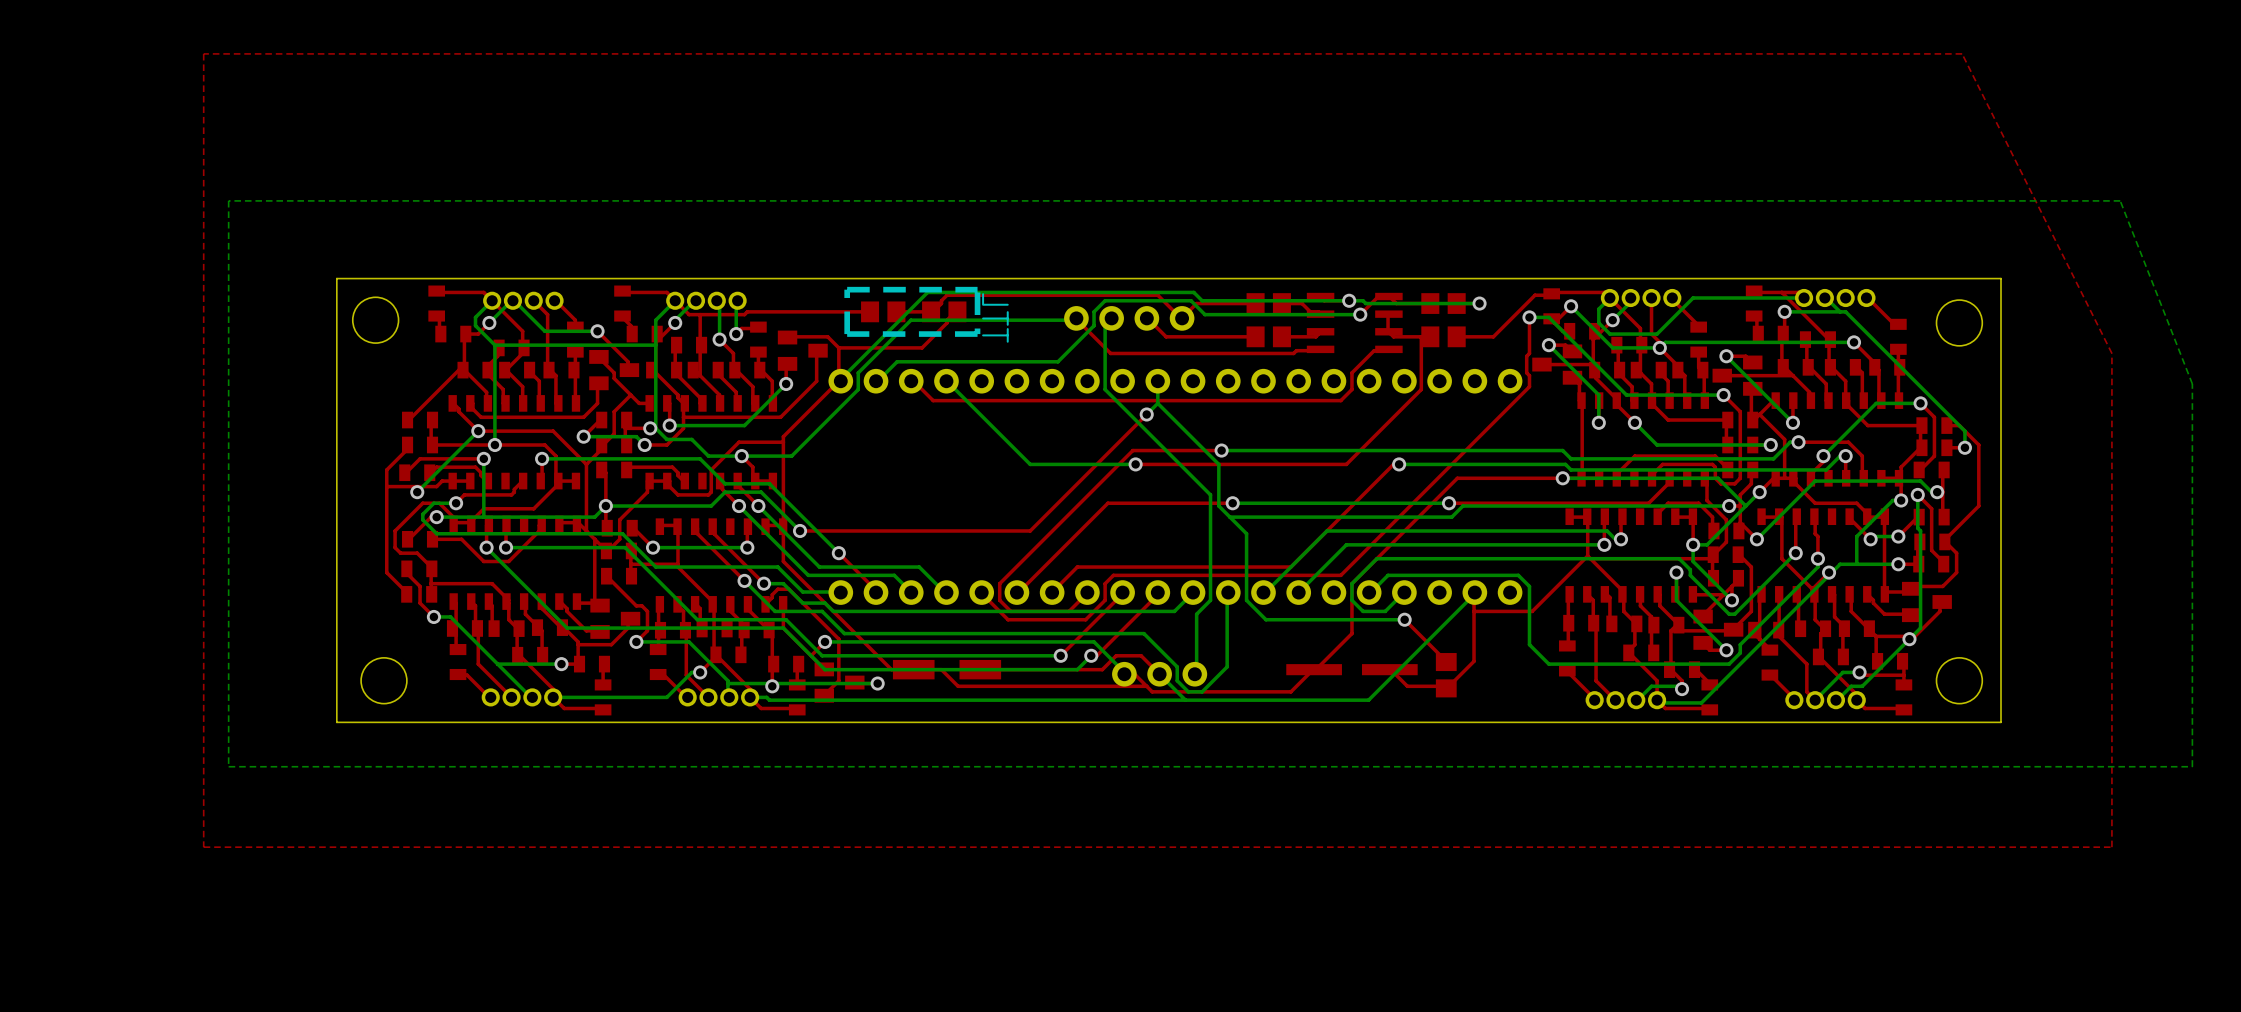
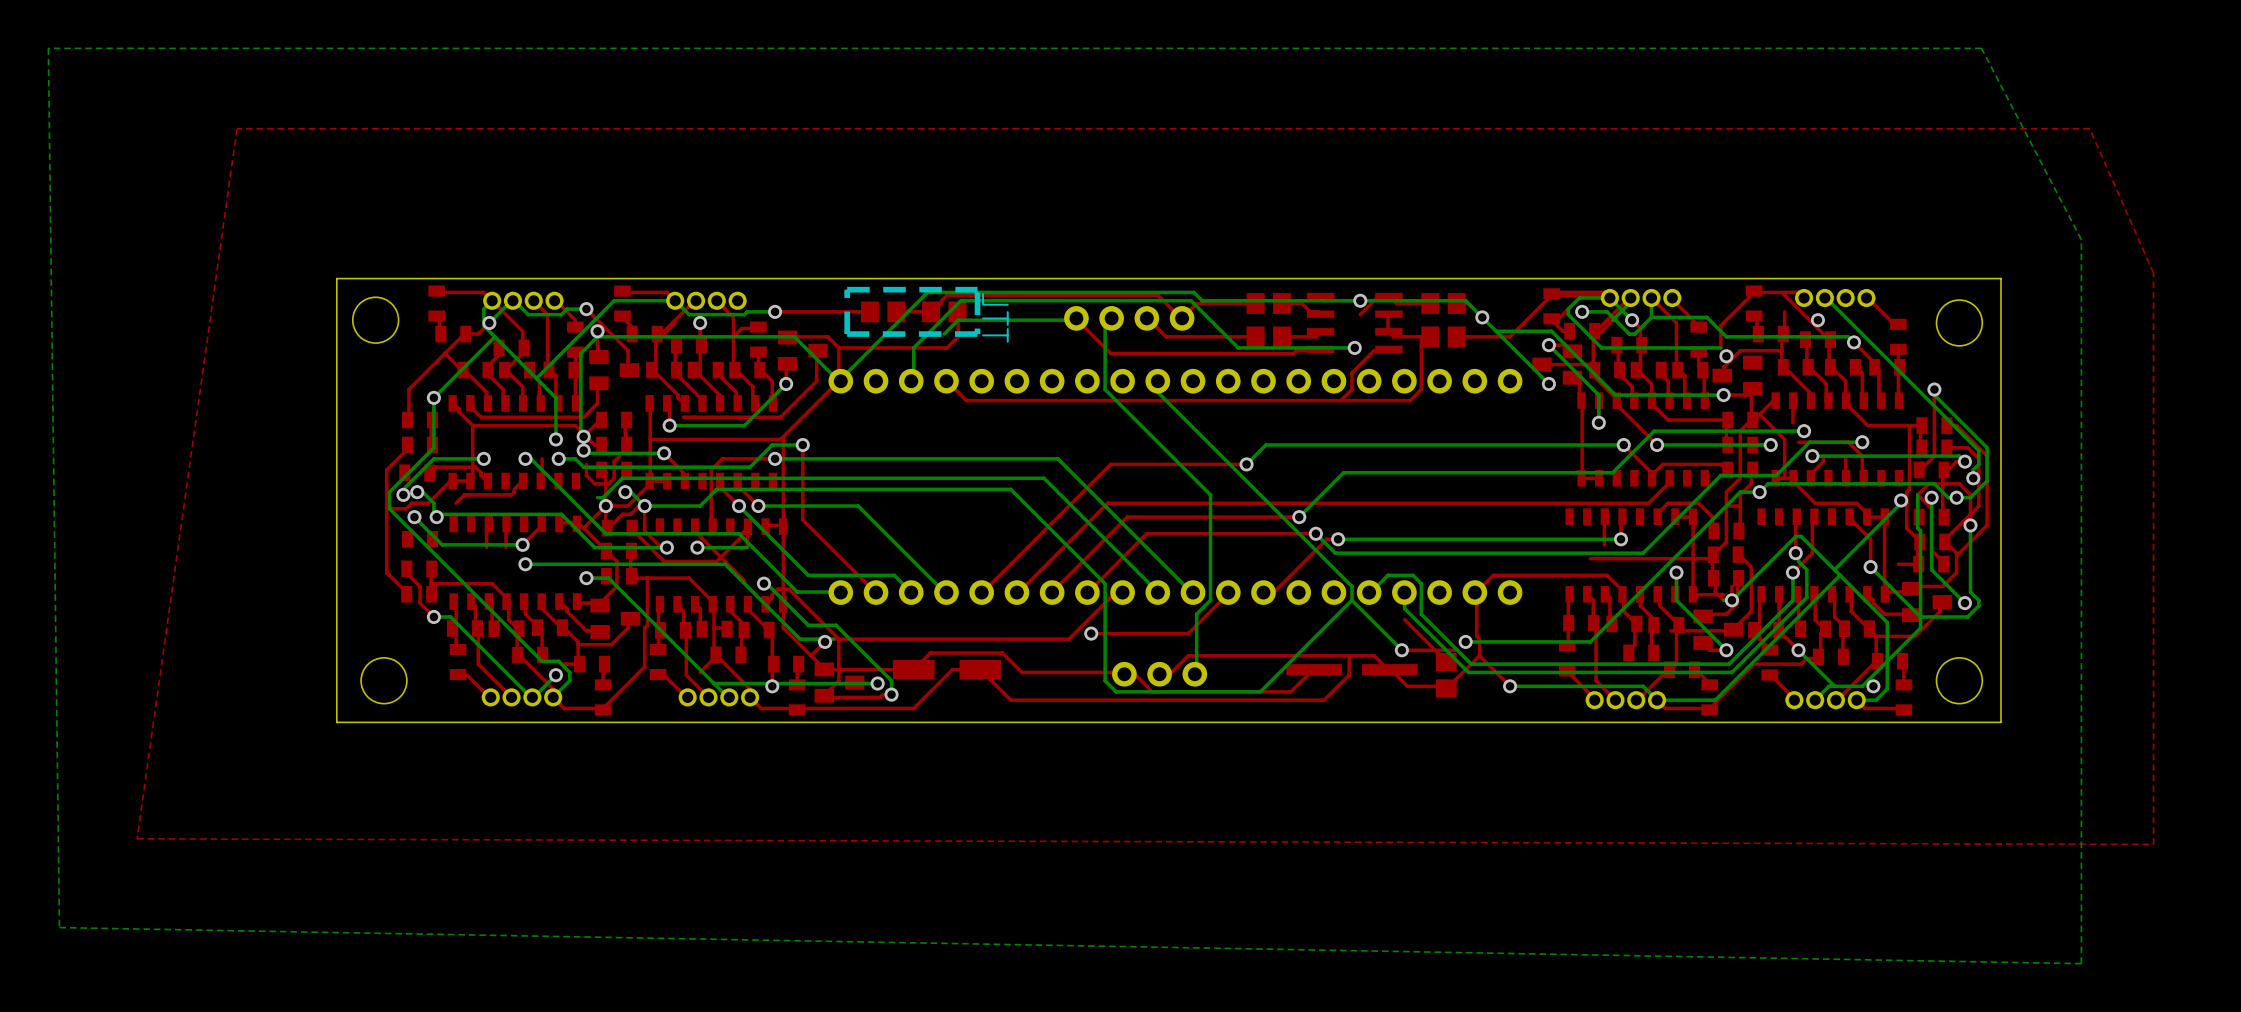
top zone outline: (1962, 53) (203, 53) (203, 847) (2111, 847) (2111, 353) (1962, 53) -> (2089, 128) (2153, 273) (2153, 844) (137, 838) (236, 128) (2089, 128)
bottom zone outline: (2120, 200) (228, 200) (228, 766) (2192, 766) (2192, 383) (2120, 200) -> (1981, 48) (2081, 239) (2081, 963) (59, 927) (48, 48) (1981, 48)
top track: none -> (1754, 292) (1720, 325) (1720, 347)
top track: (1551, 295) (1535, 295) (1493, 336) -> (1607, 295) (1551, 295) (1510, 336) (1493, 336)
top track: (1609, 298) (1632, 320) -> (1634, 422) (1657, 445)
bottom track: (1609, 298) (1598, 309) (1598, 322) (1609, 334) (1629, 334) -> (1582, 311) (1607, 311) (1629, 334)
top track: none -> (1630, 298) (1594, 331)
top track: (1651, 298) (1651, 334) (1659, 342) (1659, 347) (1676, 364) -> (1651, 298) (1676, 322) (1676, 364)
bottom track: none -> (1651, 298) (1651, 317)
bottom track: (1804, 298) (1693, 298) (1657, 334) (1634, 334) -> (1651, 317) (1634, 334)
top track: (675, 300) (689, 314) (744, 314) (747, 311) (775, 311) -> none
bottom track: (675, 300) (655, 320) (655, 428) -> none
top track: none -> (696, 300) (655, 339) (657, 334)
bottom track: (696, 300) (675, 320) (675, 322) -> none
bottom track: (716, 300) (719, 303) (719, 339) -> none
bottom track: (737, 300) (736, 334) -> none
bottom track: (1105, 300) (1094, 311) (1094, 325) (1057, 361) (897, 361) (876, 381) -> (1105, 300) (960, 300) (913, 347) (913, 381) (911, 381)
via: (1349, 300) -> none
via: none -> (1360, 300)
bottom track: (1363, 300) (1365, 303) (1479, 303) -> (1363, 300) (1465, 300) (1548, 383)
via position: (1479, 303) -> (1482, 317)
bottom track: (1571, 306) (1612, 347) -> (1632, 320) (1609, 298) (1579, 298) (1568, 309) (1568, 314) (1601, 347) (1612, 347)
via position: (1571, 306) -> (1582, 311)
bottom track: (483, 309) (475, 317) (475, 325) (494, 345) -> (483, 309) (483, 325) (555, 397) (555, 439)
via: none -> (586, 309)
bottom track: none -> (775, 311) (747, 311) (744, 314) (689, 314) (675, 300) (614, 300) (536, 378)
via: none -> (775, 311)
top track: (957, 311) (947, 320) (947, 322) (922, 347) -> (957, 311) (958, 336) (947, 347) (922, 347)
bottom track: (1784, 311) (1845, 311) (1964, 431) (1964, 447) -> none
via position: (1784, 311) -> (1817, 320)
bottom track: none -> (1840, 311) (1978, 450) (1978, 464) (1973, 469) (1973, 478)
bottom track: (528, 314) (544, 331) (597, 331) -> (528, 314) (561, 314) (567, 309) (586, 309)
top track: (700, 314) (700, 322) -> none
bottom track: (1360, 314) (1204, 314) -> (1354, 347) (1238, 347) (1204, 314)
via: (1360, 314) -> none
top track: (1529, 317) (1529, 353) (1526, 356) (1526, 372) (1529, 375) (1529, 386) (1340, 575) (1113, 575) (1105, 583) (1105, 600) (1085, 619) (1008, 619) (981, 592) -> (1135, 464) (1110, 464) (981, 592)
bottom track: (1529, 317) (1548, 317) (1626, 395) -> (1496, 331) (1551, 331) (1615, 395) (1626, 395)
via: (1529, 317) -> none
bottom track: none -> (1651, 317) (1706, 317) (1726, 336) (1848, 336)
bottom track: (958, 320) (910, 320) (858, 372) (858, 389) (791, 456) (708, 456) (691, 439) (666, 439) (655, 428) -> (958, 320) (944, 334)
via: (1612, 320) -> none
via: none -> (1632, 320)
via: (675, 322) -> none
via: none -> (700, 322)
top track: (597, 331) (628, 361) -> (586, 309) (628, 350) (628, 361)
top track: (464, 334) (464, 370) -> none
via: (736, 334) -> none
top track: (719, 339) (733, 353) -> (716, 300) (733, 317) (733, 353)
via: (719, 339) -> none
bottom track: (1853, 342) (1665, 342) (1659, 347) -> (1720, 347) (1659, 347)
bottom track: (494, 345) (494, 445) -> none
bottom track: (655, 345) (494, 345) -> none
via: none -> (1354, 347)
via: (1659, 347) -> none
top track: none -> (445, 353) (461, 370)
top track: (598, 356) (614, 372) (614, 378) (639, 403) (649, 403) -> (598, 356) (597, 336)
top track: (1726, 356) (1745, 356) (1752, 362) -> none
bottom track: (1726, 356) (1792, 422) -> none
top track: (461, 370) (458, 370) (408, 420) -> (464, 334) (408, 389) (408, 420)
top track: (1792, 375) (1723, 375) -> (1781, 350) (1740, 350) (1723, 367) (1723, 375)
bottom track: none -> (838, 381) (794, 336) (597, 336) (580, 353) (580, 431)
top track: (911, 381) (913, 381) (933, 400) (966, 400) -> (946, 381) (966, 400)
bottom track: (946, 381) (1030, 464) (1135, 464) -> none
via: none -> (1548, 383)
top track: none -> (1752, 388) (1751, 395) (1723, 395)
bottom track: none -> (1934, 389) (1934, 395) (1987, 447) (1987, 481) (1970, 497) (1948, 497) (1934, 483) (1768, 483) (1759, 492) (1740, 492) (1590, 641) (1465, 641)
bottom track: (1157, 392) (1157, 403) -> (1157, 392) (1351, 586)
top track: (630, 395) (614, 411) (614, 433) (601, 445) -> none
top track: (1723, 395) (1740, 411) (1740, 431) -> (1751, 420) (1740, 431)
via: none -> (433, 397)
top track: (1410, 400) (1346, 464) (1246, 464) -> (1410, 400) (1340, 400)
top track: none -> (649, 403) (650, 481)
top track: (683, 403) (683, 428) (666, 445) (644, 445) -> none
bottom track: (1157, 403) (1218, 464) (1218, 506) (1246, 533) (1246, 600) (1265, 619) (1404, 619) -> none
bottom track: (1157, 403) (1146, 414) -> none
top track: (1920, 403) (1934, 417) -> (1934, 389) (1934, 417)
bottom track: (1920, 403) (1876, 403) (1823, 456) -> none
via position: (1920, 403) -> (1934, 389)
top track: (1146, 414) (1030, 530) (800, 530) -> none
via: (1146, 414) -> none
bottom track: (1634, 422) (1657, 445) -> none
via: (1634, 422) -> none
via: (1792, 422) -> none
top track: (472, 425) (478, 431) (553, 431) (586, 464) (600, 450) (600, 445) -> (470, 481) (472, 481) (472, 425) (575, 425) (594, 445) (600, 445)
top track: none -> (1909, 425) (1909, 489) (1906, 492) (1906, 528) (1919, 541)
top track: (1956, 425) (1959, 425) (1978, 445) (1978, 458) -> (1964, 447) (1967, 447) (1978, 458)
top track: none -> (1956, 425) (1987, 456) (1987, 525) (1956, 555)
top track: (650, 428) (625, 428) -> none
via: (650, 428) -> none
bottom track: (478, 431) (417, 492) -> none
via: (478, 431) -> none
bottom track: none -> (1804, 431) (1654, 431) (1612, 472) (1343, 472) (1299, 517)
via: none -> (1804, 431)
bottom track: (583, 436) (636, 436) (644, 445) -> none
top track: none -> (783, 436) (780, 439) (650, 439)
via: none -> (555, 439)
top track: (783, 442) (739, 442) (722, 458) -> (775, 458) (722, 458)
bottom track: (1798, 442) (1790, 442) (1773, 458) (1571, 458) (1562, 450) (1221, 450) -> none
via: (1798, 442) -> none
bottom track: none -> (1862, 442) (1809, 442) (1776, 475) (1720, 475) (1643, 553) (1335, 553) (1315, 533)
via: none -> (1862, 442)
top track: (432, 445) (544, 445) (555, 456) (555, 486) (533, 508) (483, 508) (469, 522) -> none
via: (494, 445) -> none
via: (644, 445) -> none
via: none -> (802, 445)
top track: none -> (1623, 445) (1651, 472) (1652, 478)
bottom track: none -> (1623, 445) (1265, 445) (1246, 464)
via: none -> (1623, 445)
via: none -> (1657, 445)
top track: (1920, 447) (1901, 467) (1901, 500) -> none
via position: (1964, 447) -> (1964, 461)
bottom track: none -> (583, 450) (586, 453) (664, 453)
via: none -> (583, 450)
top track: (1221, 450) (1132, 450) (999, 583) (999, 600) (1010, 611) (1069, 611) (1087, 592) -> (1315, 533) (1146, 533) (1087, 592)
via: (1221, 450) -> none
via: none -> (664, 453)
top track: (741, 456) (752, 467) (752, 481) (772, 481) -> none
via: (741, 456) -> none
via: none -> (1812, 456)
via: (1823, 456) -> none
bottom track: (1840, 456) (1826, 469) (1571, 469) (1565, 464) (1399, 464) -> (1840, 456) (1812, 456)
bottom track: none -> (1845, 456) (1959, 456) (1964, 461)
via: (1845, 456) -> none
top track: (483, 458) (420, 458) (404, 472) -> none
bottom track: (483, 458) (483, 517) -> none
bottom track: none -> (486, 458) (433, 458) (403, 489) (403, 494)
via: none -> (525, 458)
via: (542, 458) -> none
bottom track: (558, 458) (542, 458) -> none
via: none -> (558, 458)
bottom track: (575, 458) (700, 458) (725, 483) (769, 483) (838, 553) -> (575, 458) (583, 467) (750, 467) (772, 445) (802, 445)
via: none -> (775, 458)
top track: none -> (1964, 461) (1956, 461) (1946, 469)
via: (1135, 464) -> none
via: none -> (1246, 464)
top track: (1399, 464) (1393, 464) (1290, 567) (1077, 567) -> (1299, 517) (1127, 517) (1077, 567)
via: (1399, 464) -> none
top track: (1712, 464) (1715, 467) (1715, 478) (1720, 483) (1734, 483) -> (1712, 464) (1720, 464) (1726, 469)
top track: (626, 469) (630, 467) (672, 467) (683, 481) -> (664, 453) (683, 472) (683, 481)
top track: (1726, 469) (1726, 467) (1715, 456) (1634, 456) (1618, 472) (1616, 478) -> none
top track: (586, 475) (586, 530) -> (586, 475) (594, 483) (608, 483) (614, 478) (614, 461) (625, 450) (625, 445)
bottom track: (1562, 478) (1718, 478) (1745, 506) -> none
via: (1562, 478) -> none
top track: (1581, 478) (1457, 478) (1351, 583) (1351, 633) (1314, 669) -> none
top track: (1687, 478) (1706, 478) (1706, 500) (1726, 519) -> (1734, 483) (1726, 492) (1726, 519)
top track: (1775, 478) (1759, 492) -> none
top track: (1901, 478) (1881, 478) -> none
via: none -> (1973, 478)
top track: (450, 481) (442, 481) (436, 486) (386, 486) -> (450, 481) (428, 503)
top track: (575, 481) (555, 481) -> none
top track: (667, 481) (669, 481) (669, 486) (677, 494) (708, 494) (711, 492) -> (712, 526) (711, 492)
top track: (647, 486) (647, 492) (619, 519) (619, 539) (606, 550) -> (647, 486) (628, 506) (605, 506) (583, 528)
via: none -> (625, 492)
bottom track: (1759, 492) (1706, 544) (1693, 544) (1693, 561) (1731, 600) -> none
bottom track: (1937, 492) (1931, 492) (1920, 481) (1815, 481) (1756, 539) -> none
via: (1937, 492) -> none
via: none -> (403, 494)
via: (1917, 494) -> none
bottom track: none -> (597, 497) (603, 497) (622, 478) (1044, 478) (1157, 592)
bottom track: none -> (1931, 497) (1931, 569) (1964, 603)
via: none -> (1931, 497)
via: none -> (1956, 497)
bottom track: (1901, 500) (1892, 500) (1856, 536) (1856, 564) -> none
top track: (422, 503) (395, 530) (395, 547) (400, 553) (417, 553) (431, 568) -> (422, 503) (411, 503) (406, 508) (389, 508)
top track: (428, 503) (439, 503) (453, 517) (453, 523) (469, 522) -> none
bottom track: (456, 503) (433, 503) (422, 514) (422, 519) (436, 533) (605, 533) -> (525, 458) (530, 458) (605, 533)
via: (456, 503) -> none
via: (1232, 503) -> none
top track: none -> (1449, 503) (1232, 503)
bottom track: (1449, 503) (1232, 503) -> none
via: (1449, 503) -> none
bottom track: (644, 506) (605, 506) (594, 517) (436, 517) -> (644, 506) (630, 492) (625, 492)
via: none -> (644, 506)
bottom track: (700, 506) (711, 506) (725, 492) (761, 492) (800, 530) -> none
bottom track: (758, 506) (819, 567) (919, 567) -> (758, 506) (858, 506) (919, 567)
bottom track: (1729, 506) (1462, 506) (1451, 517) (1229, 517) -> none
via: (1729, 506) -> none
top track: (1569, 516) (1587, 517) (1587, 555) -> none
top track: (1761, 516) (1781, 517) (1781, 558) (1815, 592) (1814, 594) (1812, 589) (1829, 572) -> none
top track: (1814, 516) (1815, 533) (1817, 536) (1817, 558) -> (1814, 516) (1812, 517) (1812, 553) (1792, 572)
bottom track: none -> (414, 517) (442, 544) (522, 544)
via: none -> (414, 517)
top track: (436, 517) (431, 517) (407, 539) -> none
via: none -> (1299, 517)
top track: (1917, 517) (1898, 536) -> (1917, 517) (1917, 494) (1928, 483) (1959, 483) (1970, 494) (1970, 525)
top track: (1740, 522) (1756, 539) -> none
top track: (541, 523) (539, 525) (539, 530) (508, 561) (483, 561) (461, 539) (432, 539) -> (541, 523) (522, 544)
bottom track: none -> (1970, 525) (1970, 592) (1978, 600) (1978, 605) (1967, 616) (1920, 616) (1870, 567)
via: none -> (1970, 525)
top track: (659, 526) (677, 526) (677, 567) (689, 578) -> (631, 576) (633, 578) (689, 578)
top track: (712, 526) (714, 533) (763, 583) -> none
top track: none -> (607, 528) (622, 514) (630, 514) (639, 506) (644, 506) (644, 530) (661, 547) (666, 547)
top track: (632, 528) (653, 547) -> (632, 528) (664, 561) (716, 561) (741, 536) (741, 533) (747, 528)
via: (800, 530) -> none
bottom track: (622, 533) (655, 567) (777, 567) (802, 592) -> (622, 533) (739, 533) (797, 592) (802, 592)
via: none -> (1315, 533)
bottom track: (1898, 536) (1873, 536) (1870, 539) -> none
via: (1898, 536) -> none
top track: (594, 539) (594, 603) (600, 605) -> (606, 550) (616, 561) (616, 586) (600, 605)
top track: none -> (1338, 539) (1327, 539) (1274, 592) (1263, 592)
via: none -> (1338, 539)
bottom track: (1615, 539) (1607, 530) (1327, 530) (1263, 592) -> (1615, 539) (1338, 539)
via: (1756, 539) -> none
top track: none -> (1870, 539) (1870, 567)
via: (1870, 539) -> none
via: none -> (522, 544)
bottom track: (1604, 544) (1346, 544) (1298, 592) -> none
via: (1604, 544) -> none
top track: none -> (1693, 544) (1692, 594)
via: (1693, 544) -> none
bottom track: (486, 547) (567, 628) (783, 628) (824, 669) (1077, 669) (1091, 655) -> none
via: (486, 547) -> none
via: (506, 547) -> none
bottom track: (594, 547) (506, 547) -> (594, 547) (561, 514) (433, 514) (433, 503) (420, 489)
bottom track: (625, 547) (697, 619) (786, 619) (822, 655) (1060, 655) -> (625, 547) (653, 547)
via position: (653, 547) -> (666, 547)
bottom track: (697, 547) (666, 547) -> none
via: none -> (697, 547)
via: (747, 547) -> none
top track: (838, 553) (877, 592) (876, 592) -> (802, 445) (802, 519) (876, 592)
via: (838, 553) -> none
bottom track: (1795, 553) (1734, 614) (1729, 614) (1690, 575) (1690, 569) (1679, 558) (1376, 558) (1351, 583) (1351, 586) -> none
top track: (1587, 555) (1607, 575) -> (1479, 655) (1479, 639) (1476, 636) (1476, 594) (1474, 592) (1493, 575) (1607, 575)
top track: (1587, 555) (1532, 611) (1474, 611) -> none
bottom track: (1817, 558) (1817, 567) (1740, 644) (1740, 653) -> (1792, 572) (1792, 600) (1740, 653)
via: (1817, 558) -> none
top track: (783, 561) (891, 669) -> (824, 669) (891, 669)
top track: none -> (783, 561) (783, 604)
bottom track: none -> (525, 564) (725, 564) (800, 639) (833, 639)
via: none -> (525, 564)
top track: (677, 564) (630, 564) -> none
bottom track: (1898, 564) (1840, 564) -> (1901, 503) (1840, 564)
via: (1898, 564) -> none
via: none -> (1870, 567)
bottom track: (1834, 569) (1806, 597) -> (1798, 550) (1798, 561) (1806, 569) (1806, 597)
via: none -> (1792, 572)
via: (1829, 572) -> none
bottom track: (1412, 575) (1518, 575) (1529, 586) (1529, 644) (1548, 664) -> (1412, 575) (1421, 583) (1421, 614) (1471, 664) (1548, 664)
bottom track: none -> (1840, 575) (1715, 700) (1657, 700) (1643, 686) (1510, 686)
top track: (606, 576) (636, 605) (641, 605) (647, 611) -> (647, 578) (647, 611)
via: none -> (586, 578)
top track: none -> (1713, 578) (1715, 592) (1723, 600)
bottom track: (744, 580) (775, 611) (822, 611) (836, 625) -> (766, 583) (808, 625) (836, 625)
via: (744, 580) -> none
top track: (1737, 580) (1704, 614) -> (1737, 580) (1737, 603) (1726, 614) (1704, 614)
bottom track: (766, 583) (783, 583) (802, 603) (824, 603) (833, 611) (1174, 611) (1193, 592) -> (775, 458) (1057, 458) (1193, 592)
top track: (1157, 592) (1157, 594) (1096, 655) (1091, 655) -> none
top track: none -> (1228, 592) (1188, 633) (1091, 633)
bottom track: (1228, 592) (1227, 666) (1202, 691) -> (1351, 600) (1260, 691) (1202, 691)
bottom track: (1404, 592) (1385, 611) (1363, 611) -> (1401, 650) (1363, 611)
top track: (1474, 592) (1474, 661) -> (1479, 655) (1474, 661)
bottom track: (1474, 592) (1368, 700) (769, 700) (766, 697) (750, 697) -> none
top track: (1121, 594) (1060, 655) -> (1121, 594) (1113, 594) (1069, 639) (833, 639)
bottom track: none -> (1723, 600) (1731, 600) (1795, 536) (1801, 536) (1887, 622) (1887, 689) (1876, 700) (1856, 700)
via: none -> (1964, 603)
via position: (1404, 619) -> (1401, 650)
top track: (647, 625) (647, 630) (636, 641) -> (647, 625) (644, 628) (644, 666) (603, 708)
top track: (1676, 625) (1670, 630) (1670, 669) (1682, 680) (1682, 689) -> (1676, 625) (1676, 664) (1670, 669)
top track: (1779, 630) (1779, 636) (1806, 664) (1806, 691) (1815, 700) -> (1779, 630) (1798, 650)
bottom track: (844, 633) (1143, 633) (1177, 666) (1177, 680) (1188, 691) -> (700, 506) (716, 489) (1010, 489) (1105, 583) (1105, 680) (1116, 691) (1188, 691)
bottom track: none -> (844, 633) (891, 680) (891, 694)
via: none -> (1091, 633)
via: (1909, 639) -> none
bottom track: (636, 641) (689, 641) (727, 680) (727, 697) -> (586, 578) (608, 578) (727, 697)
via: (636, 641) -> none
bottom track: (824, 641) (1094, 641) (1124, 674) -> none
via: none -> (1465, 641)
top track: none -> (1457, 650) (1401, 650)
bottom track: none -> (1798, 650) (1834, 686)
via: none -> (1798, 650)
top track: (1628, 652) (1657, 680) (1657, 700) -> none
via: (1060, 655) -> none
via: (1091, 655) -> none
top track: none -> (1349, 655) (1349, 675) (1324, 700) (1010, 700) (980, 669) (952, 669) (913, 708) (797, 708)
top track: none -> (1479, 655) (1510, 686)
top track: (1818, 656) (1856, 694) (1856, 700) -> (1818, 656) (1817, 658) (1806, 658) (1801, 664) (1754, 664) (1709, 708)
top track: none -> (1876, 661) (1835, 700)
bottom track: (561, 664) (497, 664) -> none
via position: (561, 664) -> (555, 675)
top track: (913, 669) (941, 669) (958, 686) (1146, 686) -> (913, 669) (930, 653) (1002, 653) (1021, 672) (1121, 672) (1124, 674)
top track: (980, 669) (1102, 669) (1116, 655) (1141, 655) (1159, 674) -> (1389, 669) (1374, 655) (1188, 655) (1171, 672) (1160, 672) (1159, 674)
top track: none -> (1669, 669) (1636, 700)
bottom track: (700, 672) (691, 672) (666, 697) (553, 697) -> (494, 336) (433, 397) (433, 447) (389, 492) (389, 508) (542, 661) (558, 661) (569, 672) (569, 680) (553, 697)
via: (700, 672) -> none
bottom track: (1731, 672) (1701, 702) (1659, 702) (1657, 700) -> (1731, 672) (1468, 672) (1404, 608) (1404, 592)
top track: (1859, 672) (1862, 675) (1903, 675) -> none
bottom track: (1859, 672) (1842, 672) (1829, 686) -> none
via position: (1859, 672) -> (1873, 686)
bottom track: (1159, 674) (1185, 700) -> none
bottom track: none -> (555, 675) (532, 697)
bottom track: none -> (727, 683) (714, 683)
via: none -> (1510, 686)
bottom track: (1851, 686) (1835, 700) -> (1851, 686) (1829, 686)
bottom track: (1682, 689) (1679, 686) (1651, 686) (1636, 700) -> none
via: (1682, 689) -> none
top track: none -> (891, 694) (883, 694) (880, 697) (824, 697) (824, 695)
via: none -> (891, 694)

